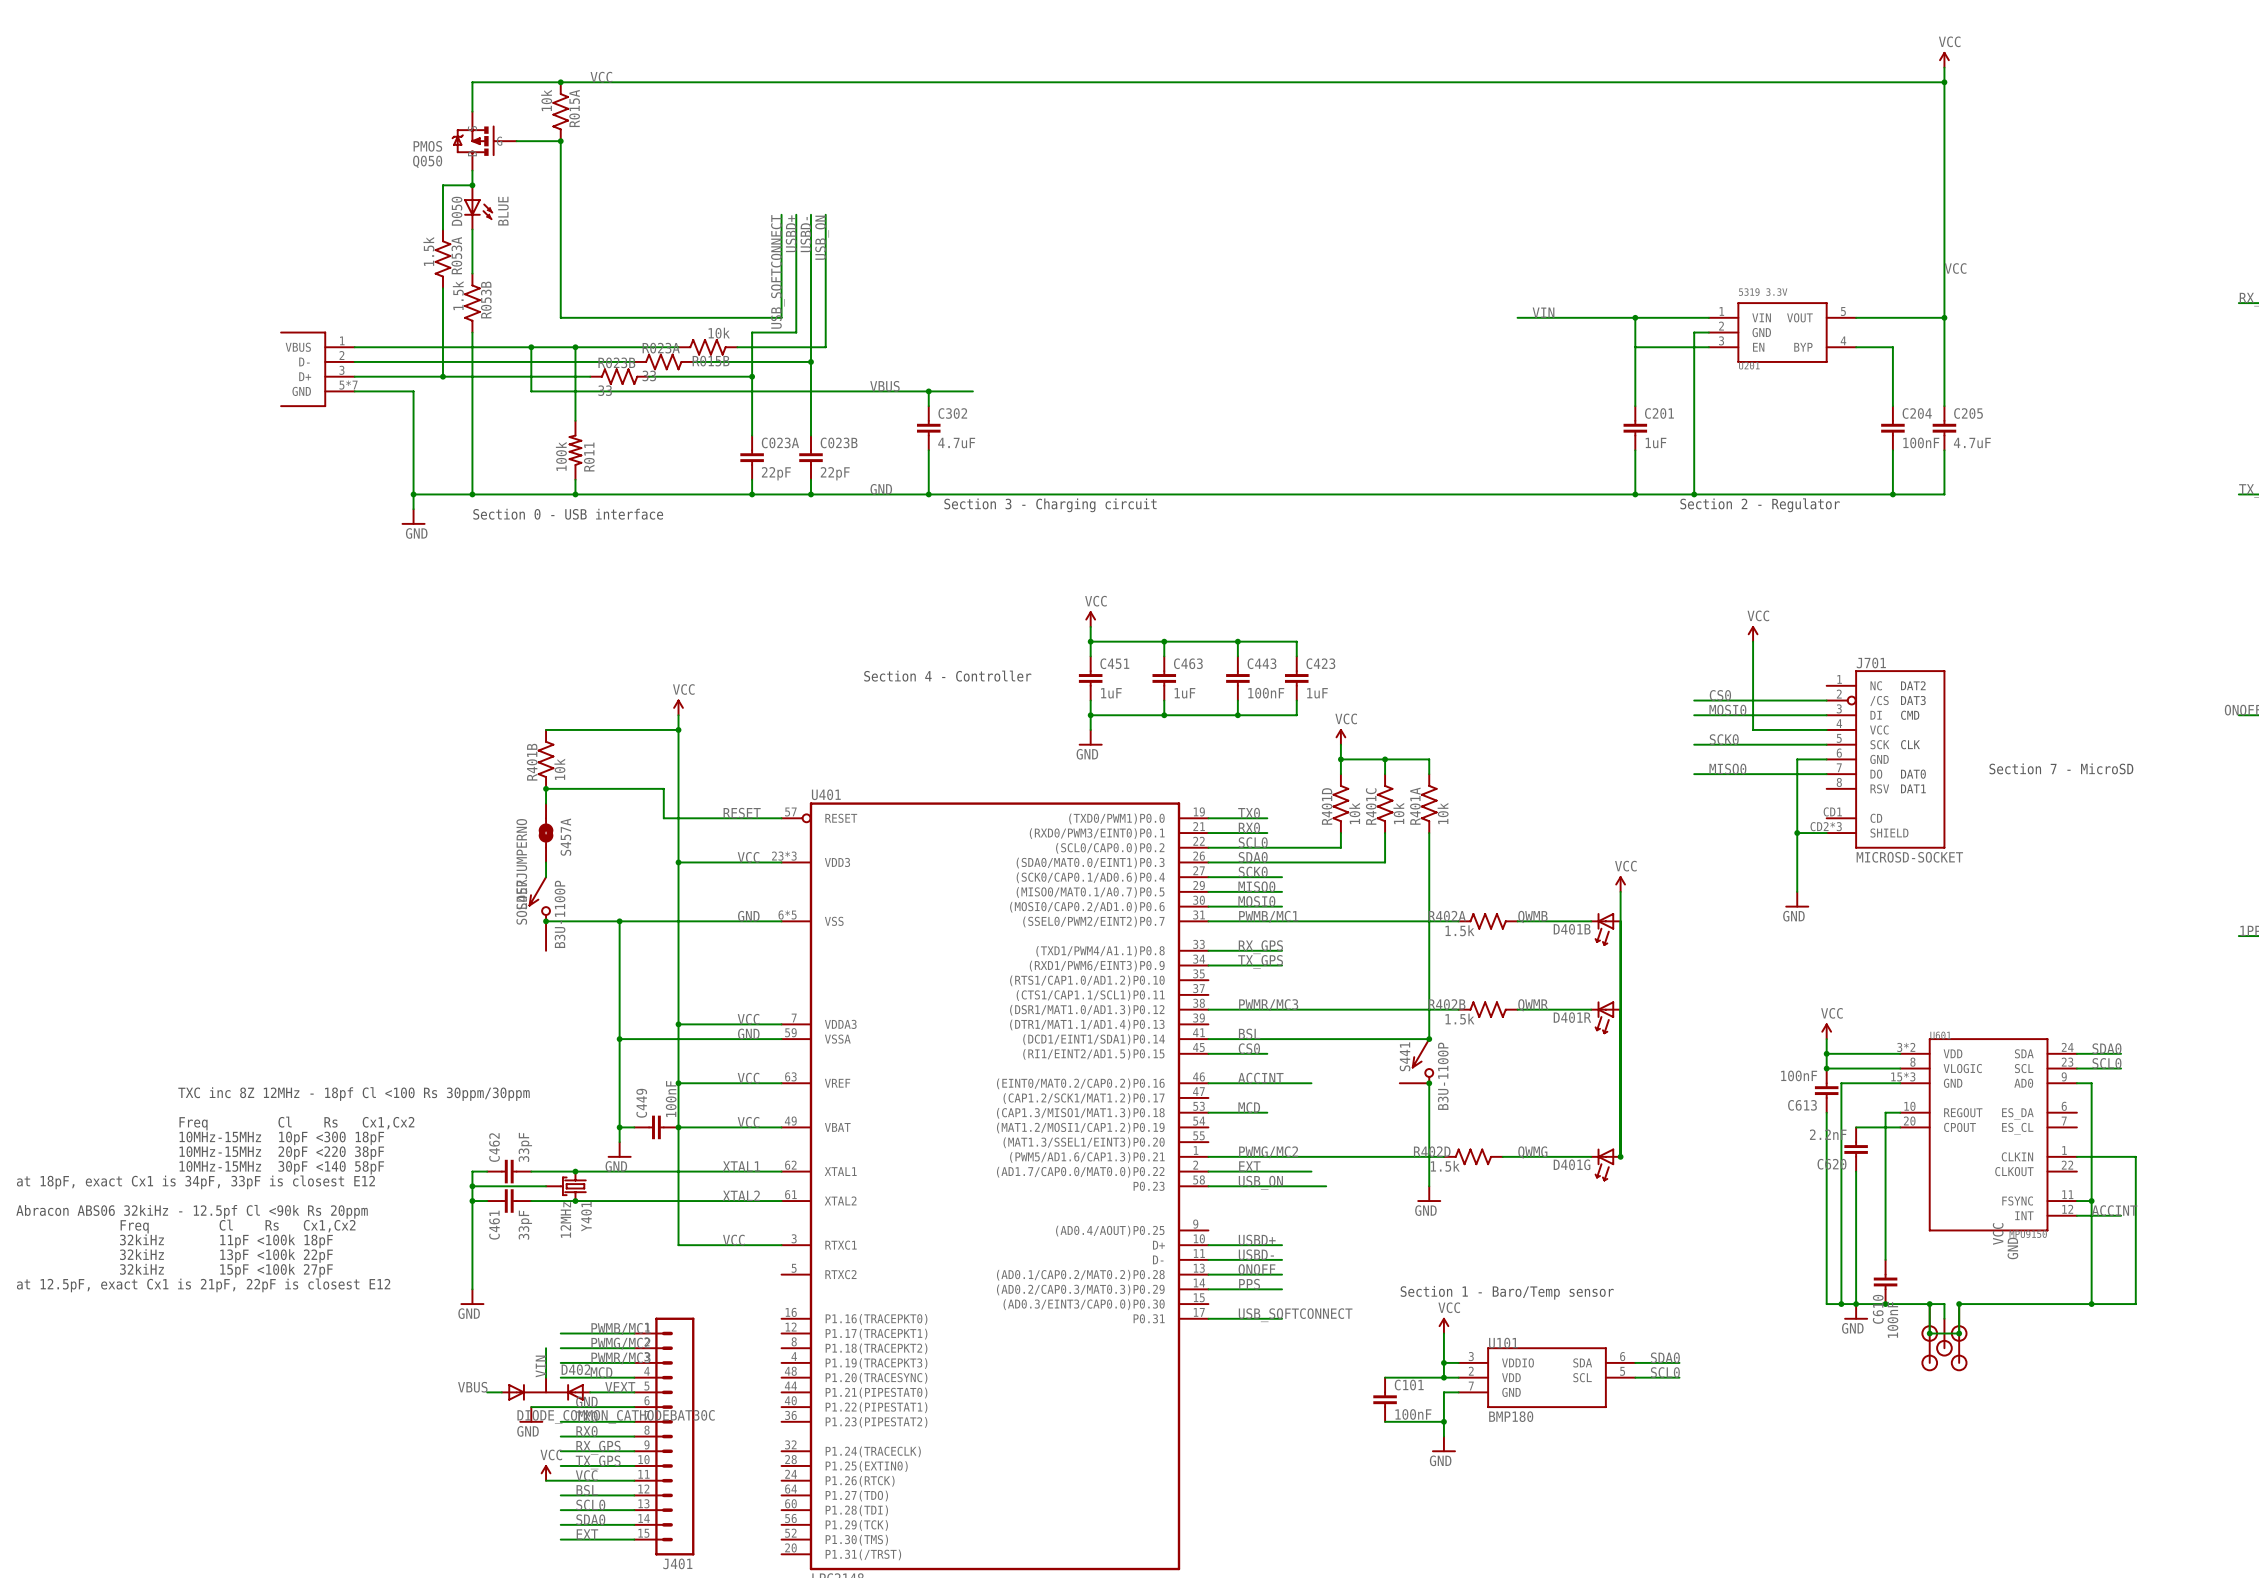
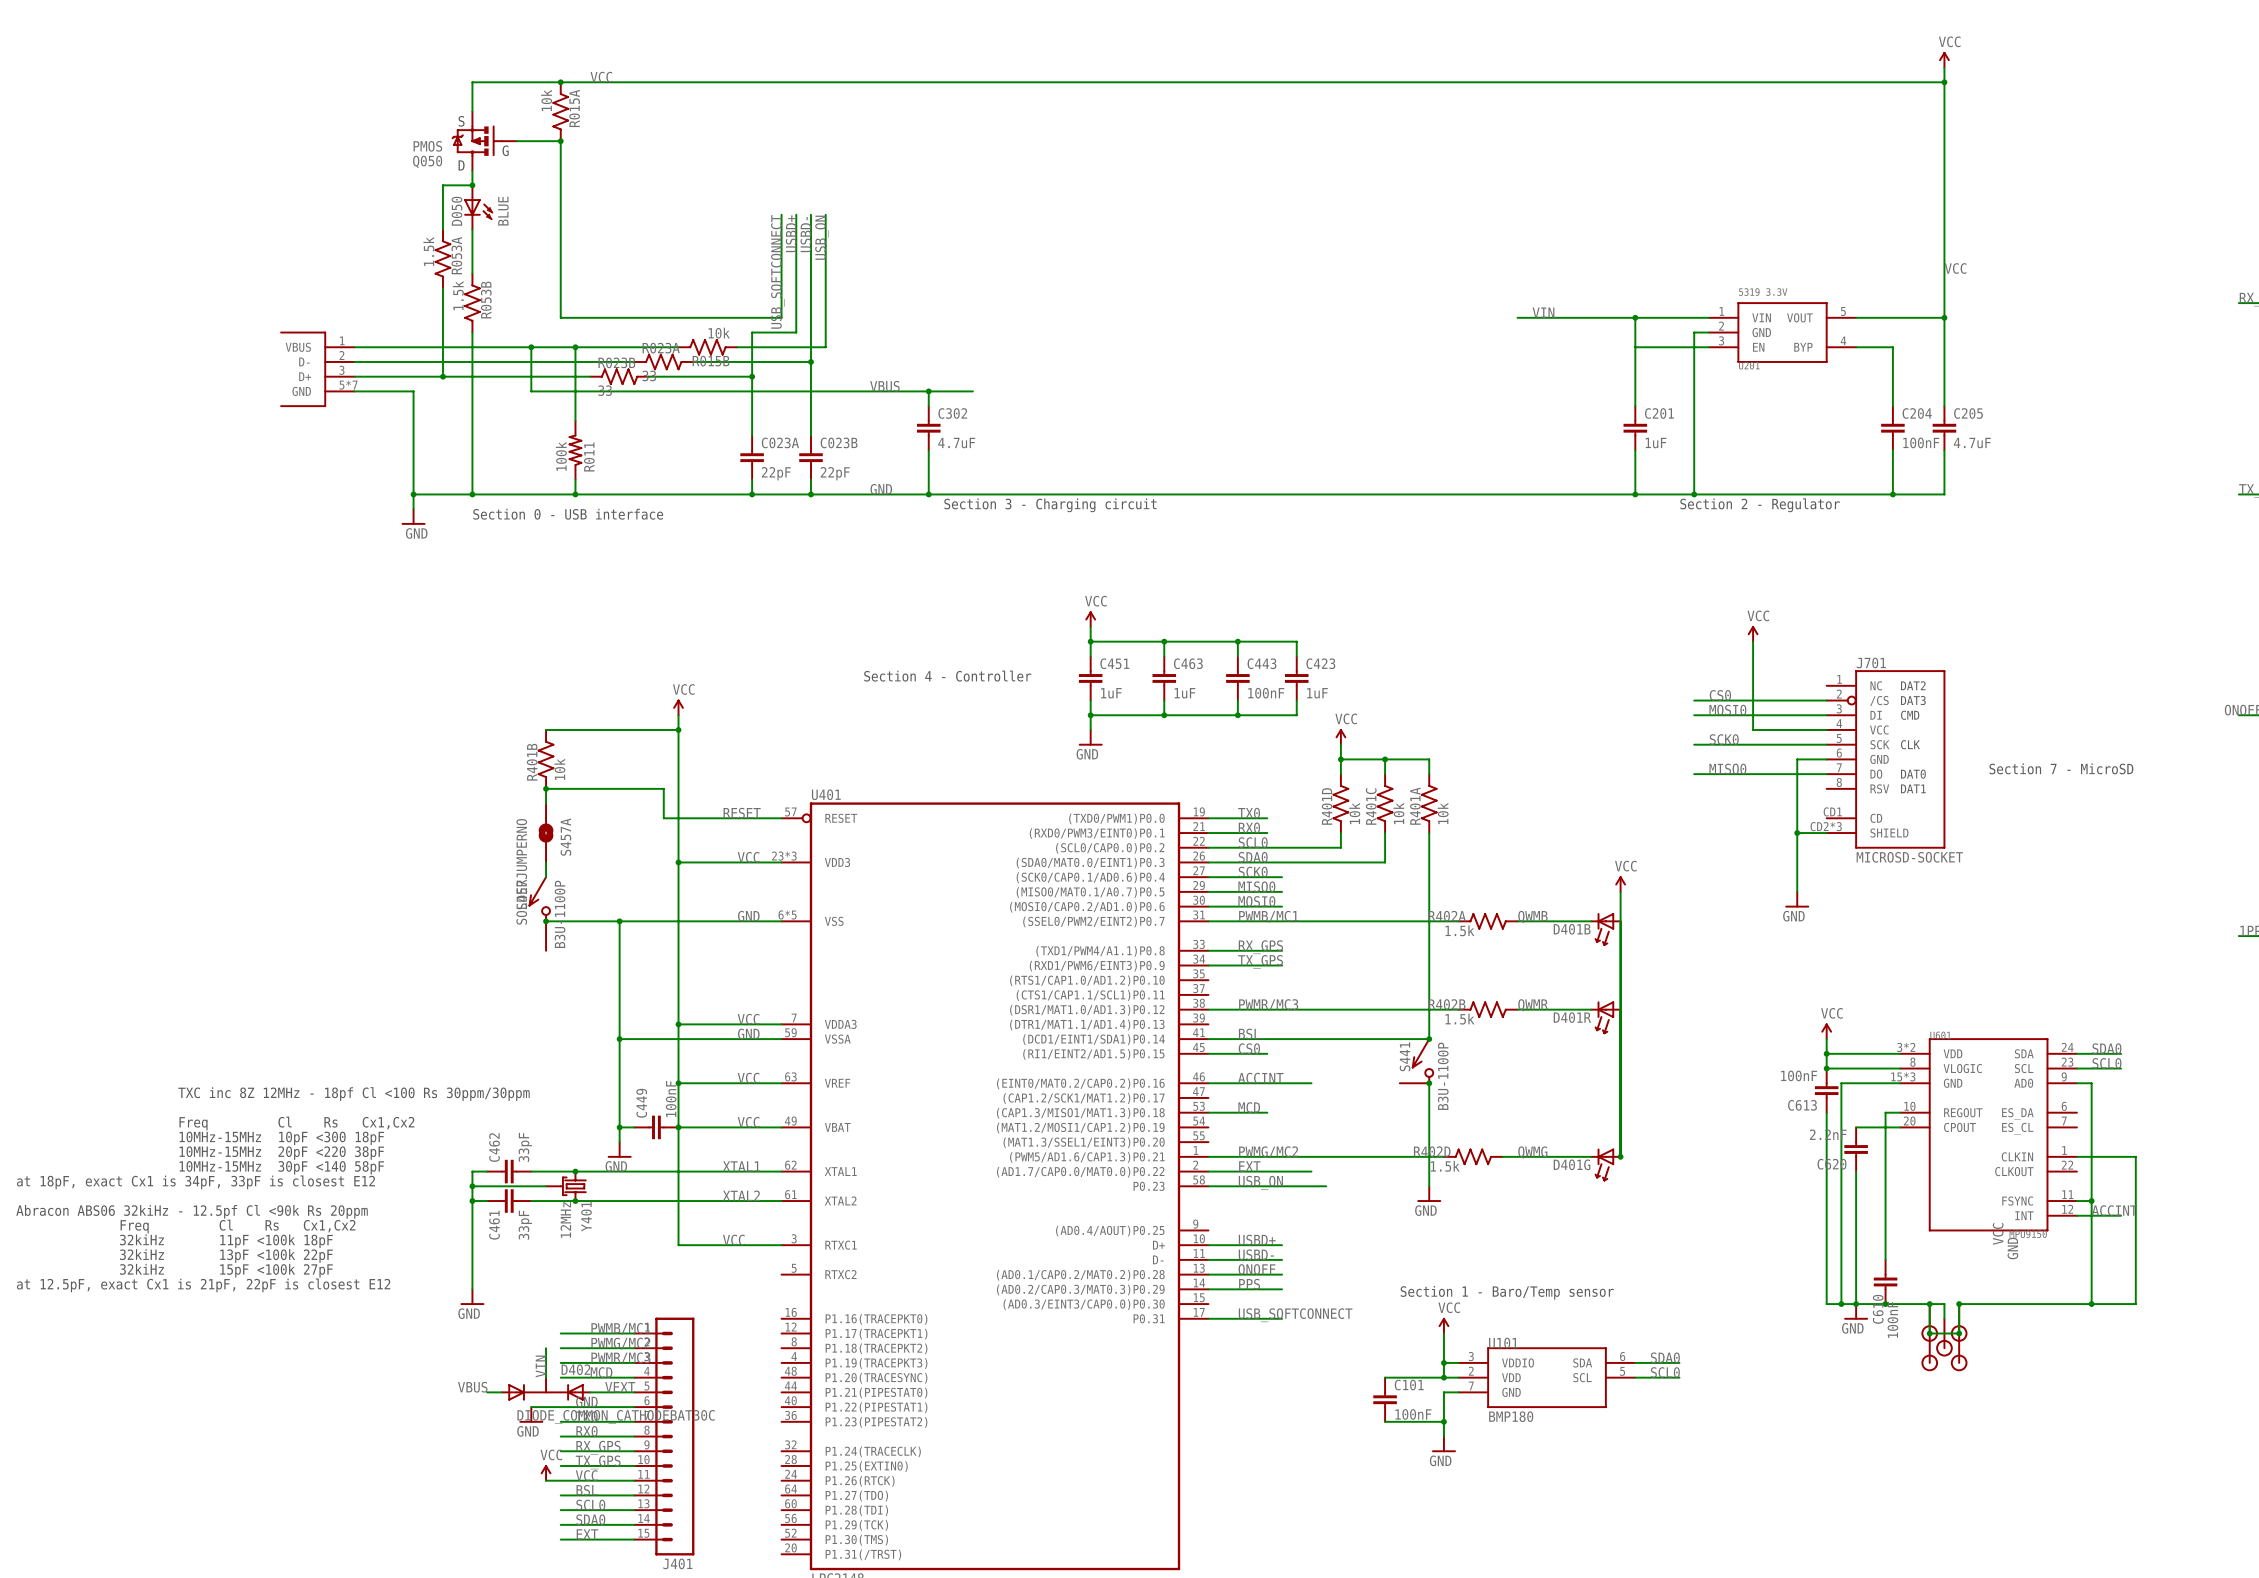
Q050 symbol: [452, 111, 518, 172] -> [452, 111, 517, 171]
text: none -> S (461, 121)
text: none -> G (505, 150)
text: none -> D (461, 165)

